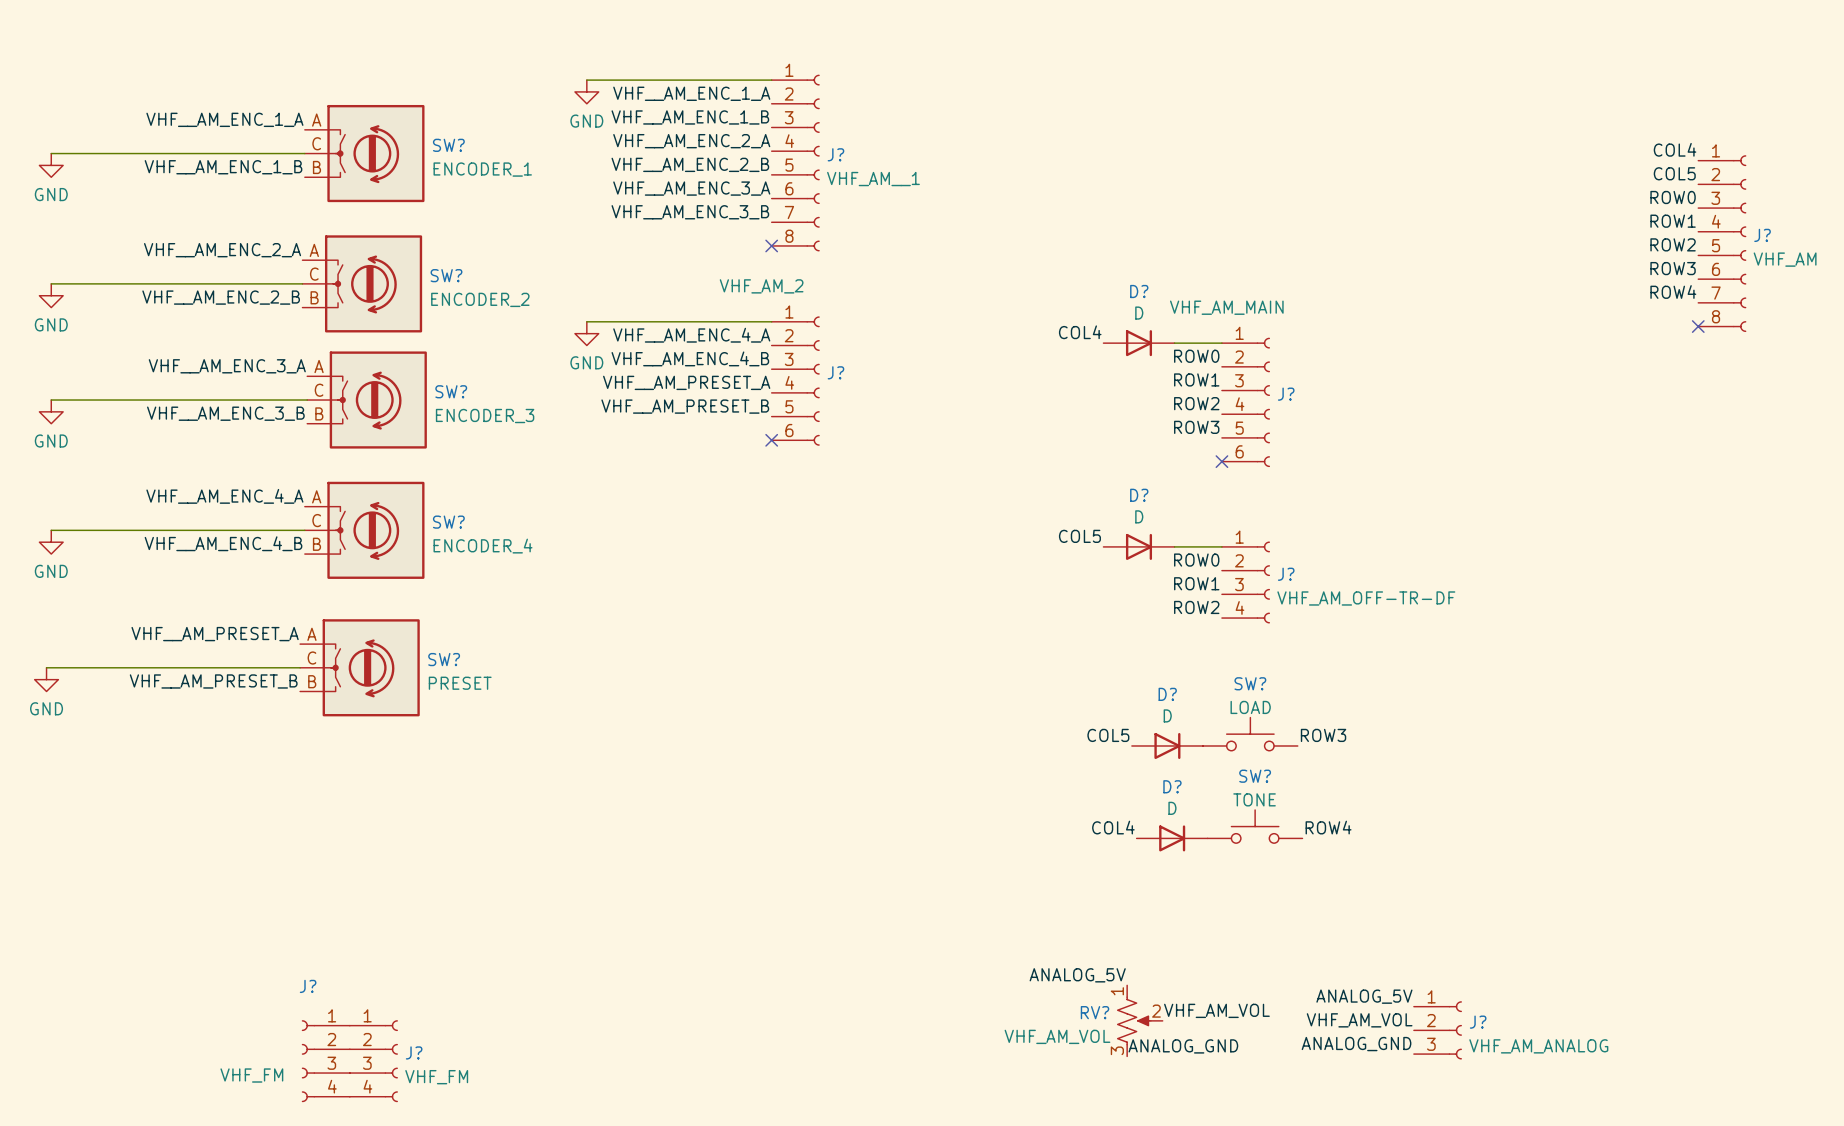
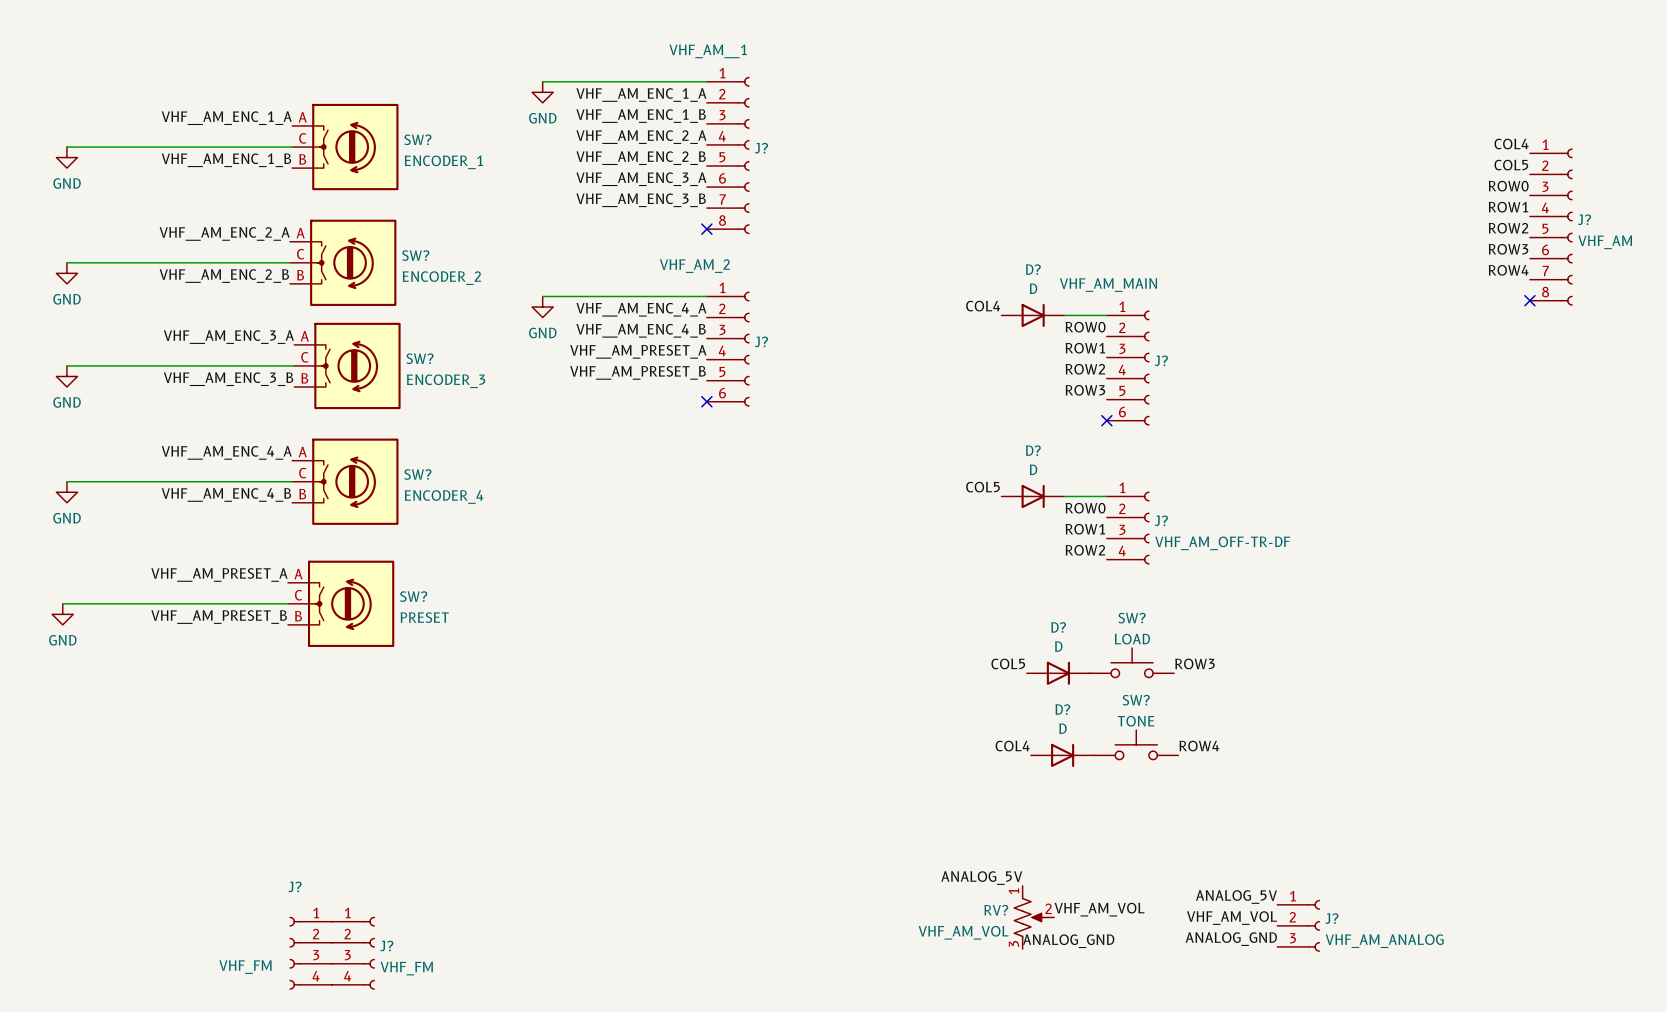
J? value position: VHF_AM__1 (873, 179) -> VHF_AM__1 (708, 51)

